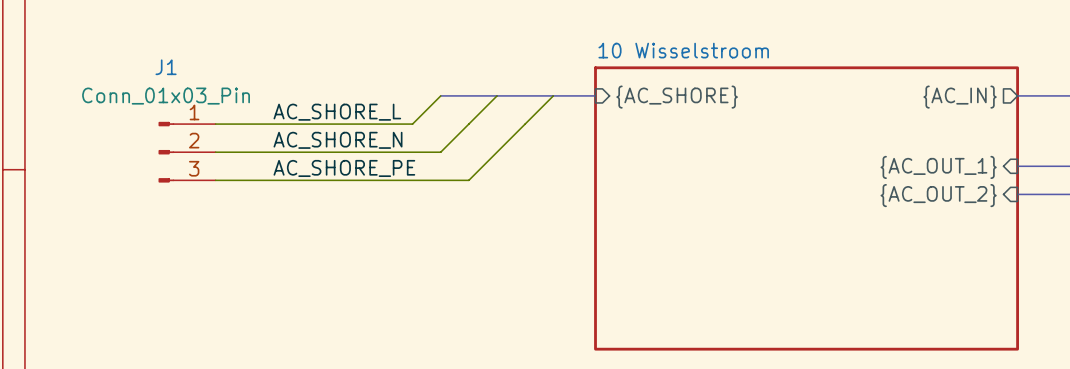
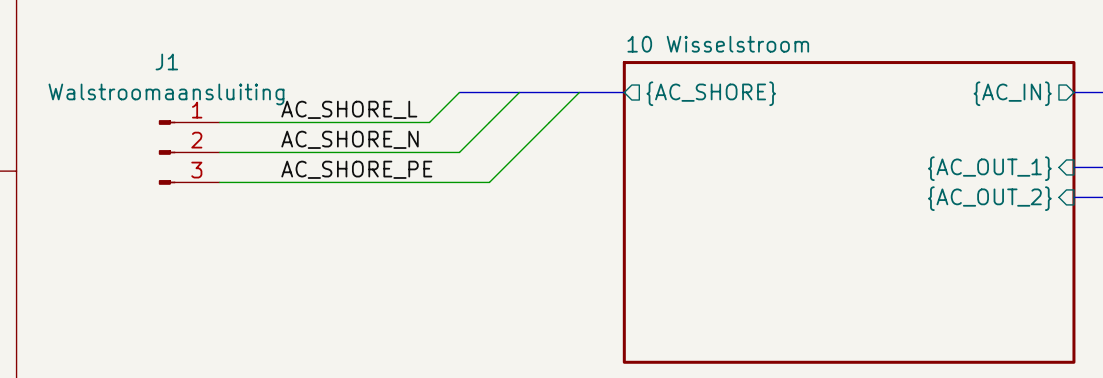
J1 value: Conn_01x03_Pin (166, 96) -> Walstroomaansluiting (166, 94)
sheet pin shape: input (677, 97) -> output (711, 93)

